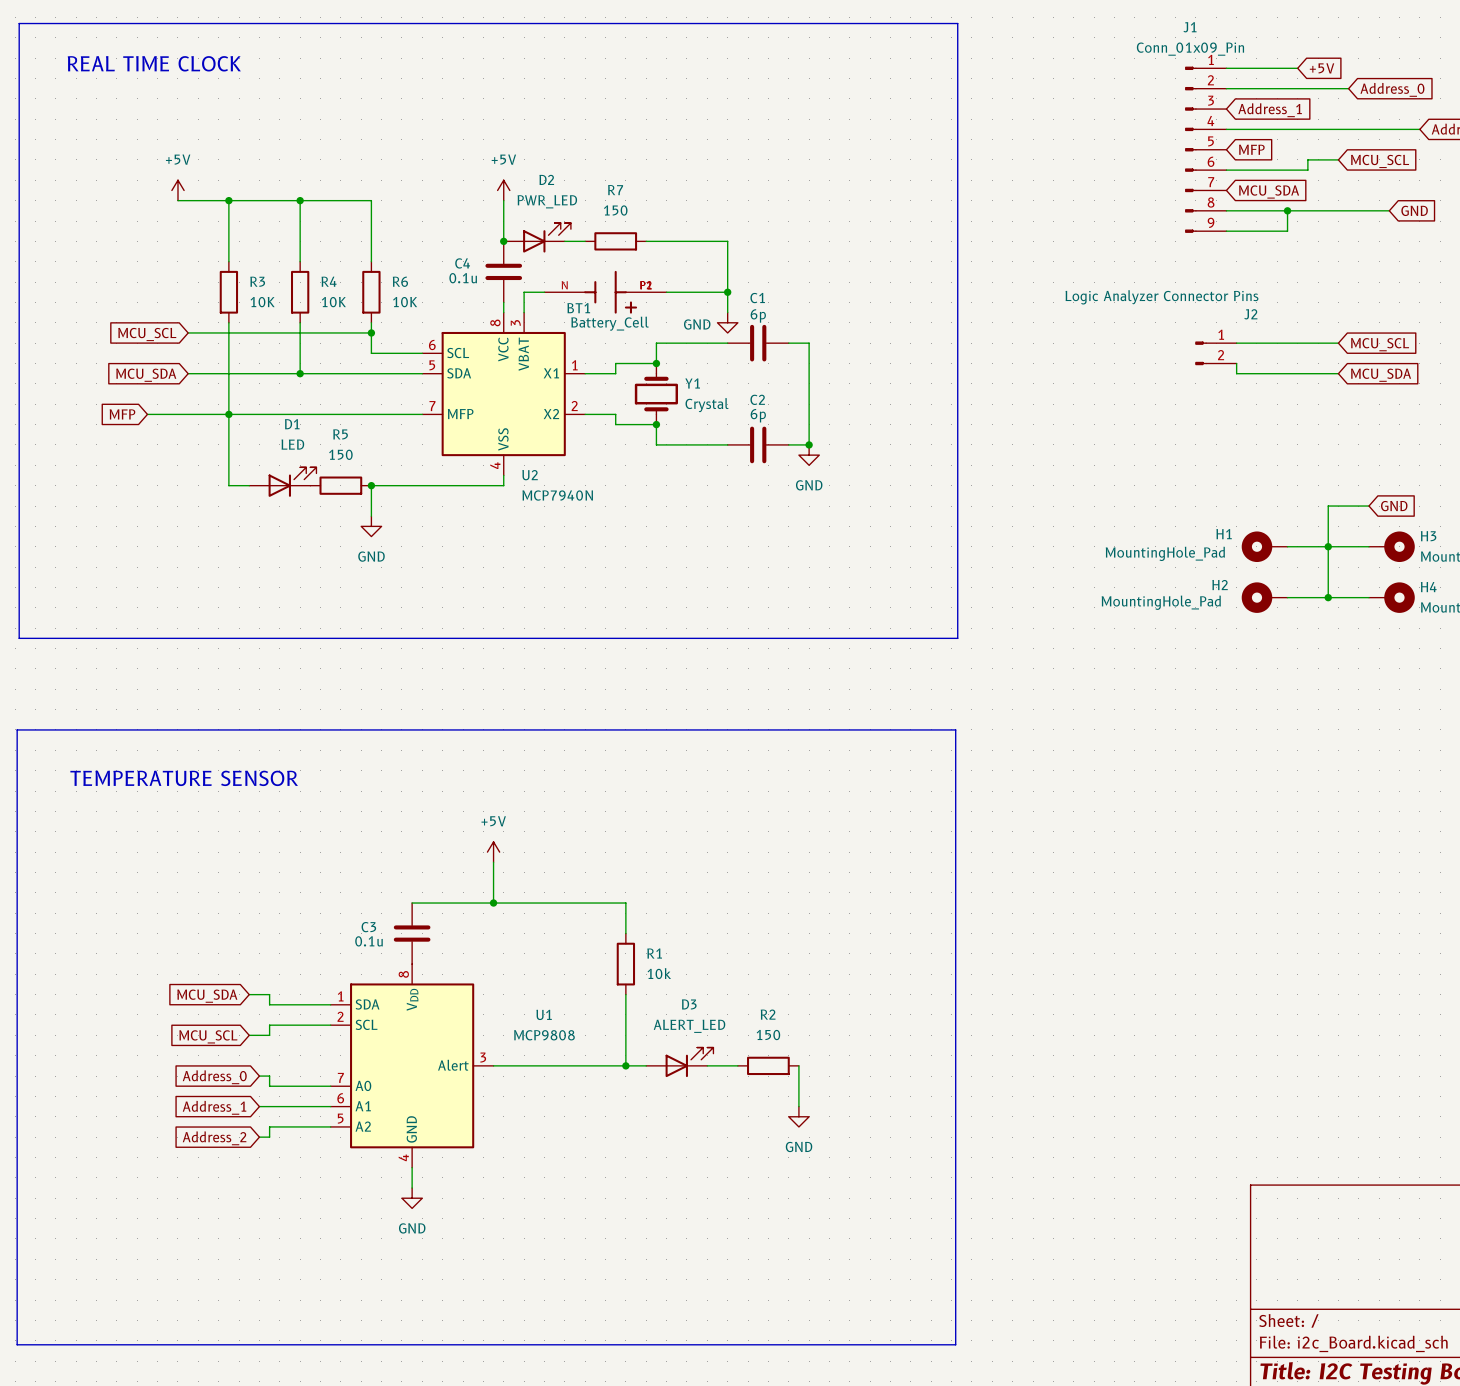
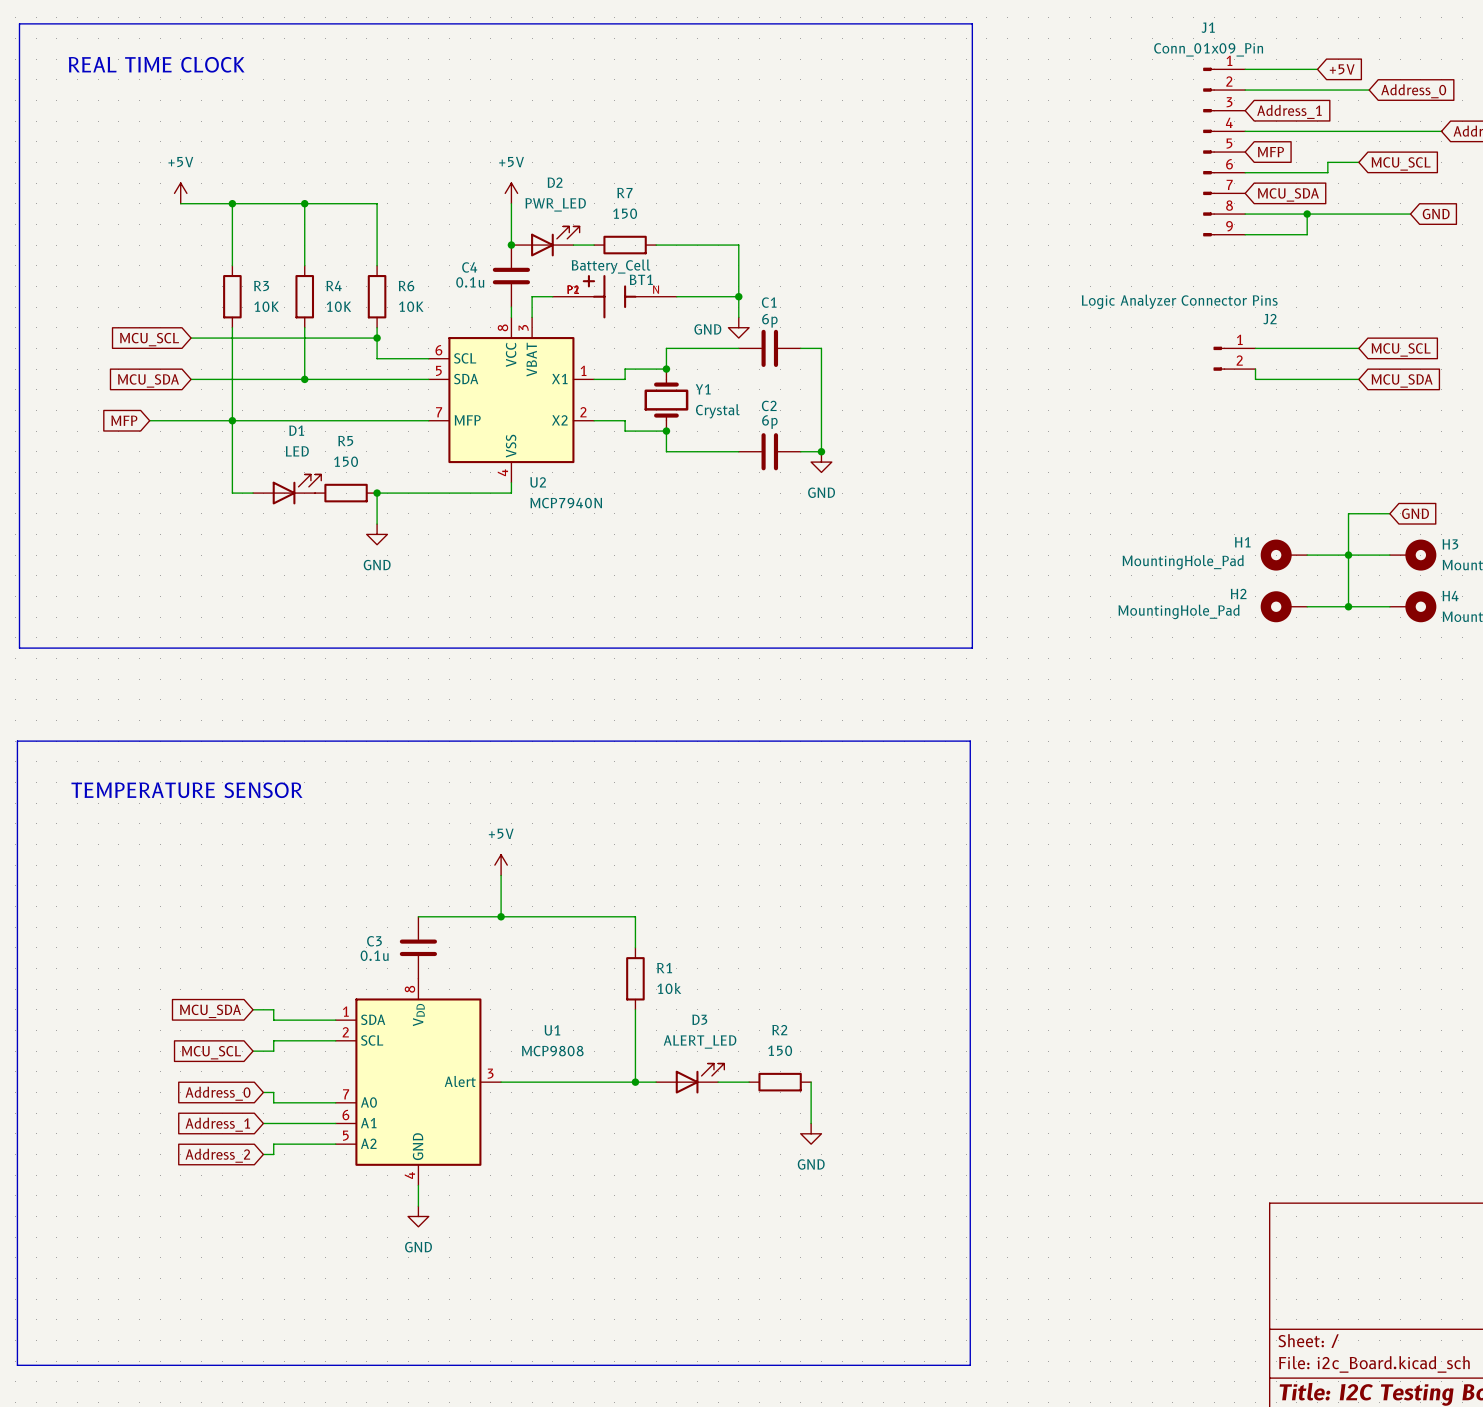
BT1 rotation: 0° (610, 292) -> 180° (609, 296)

